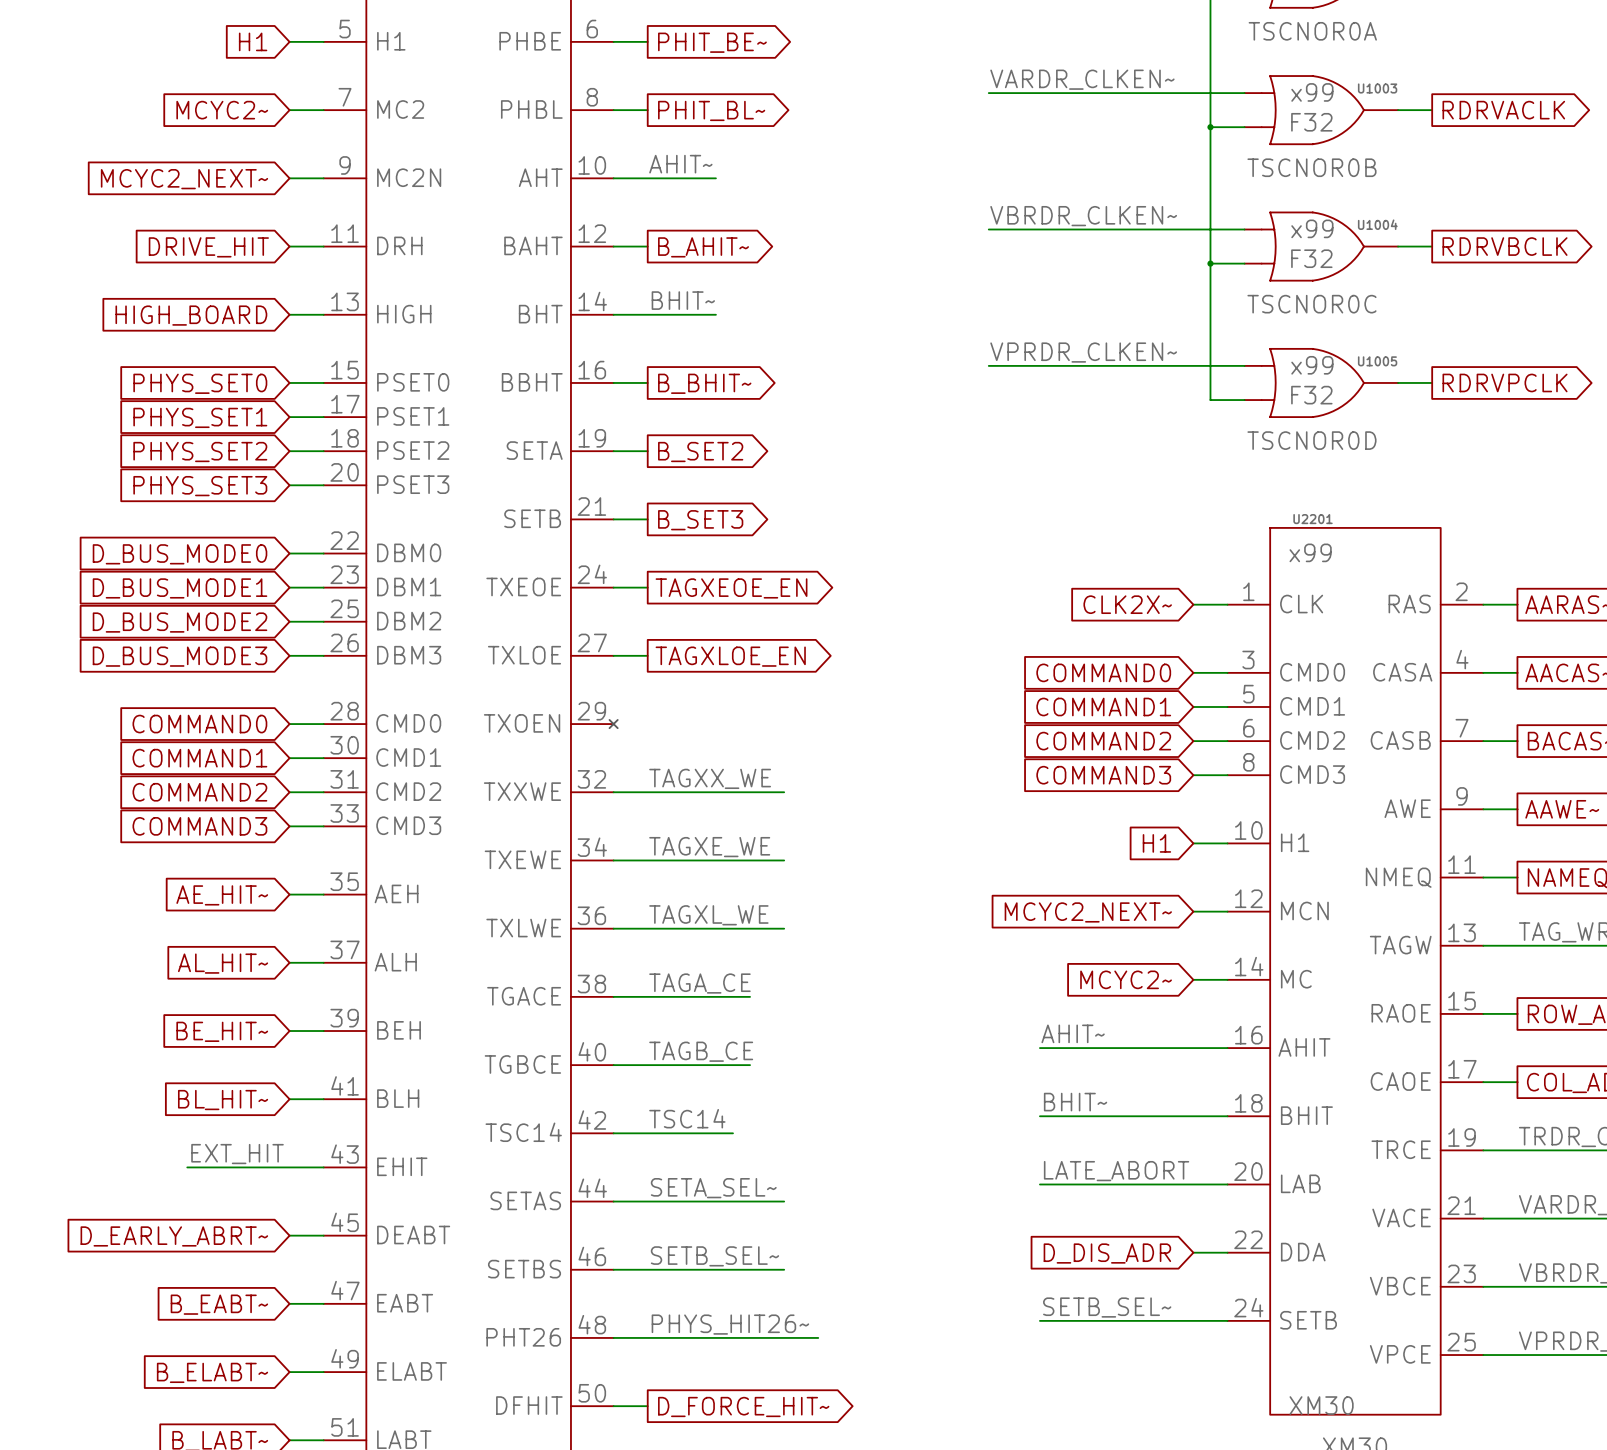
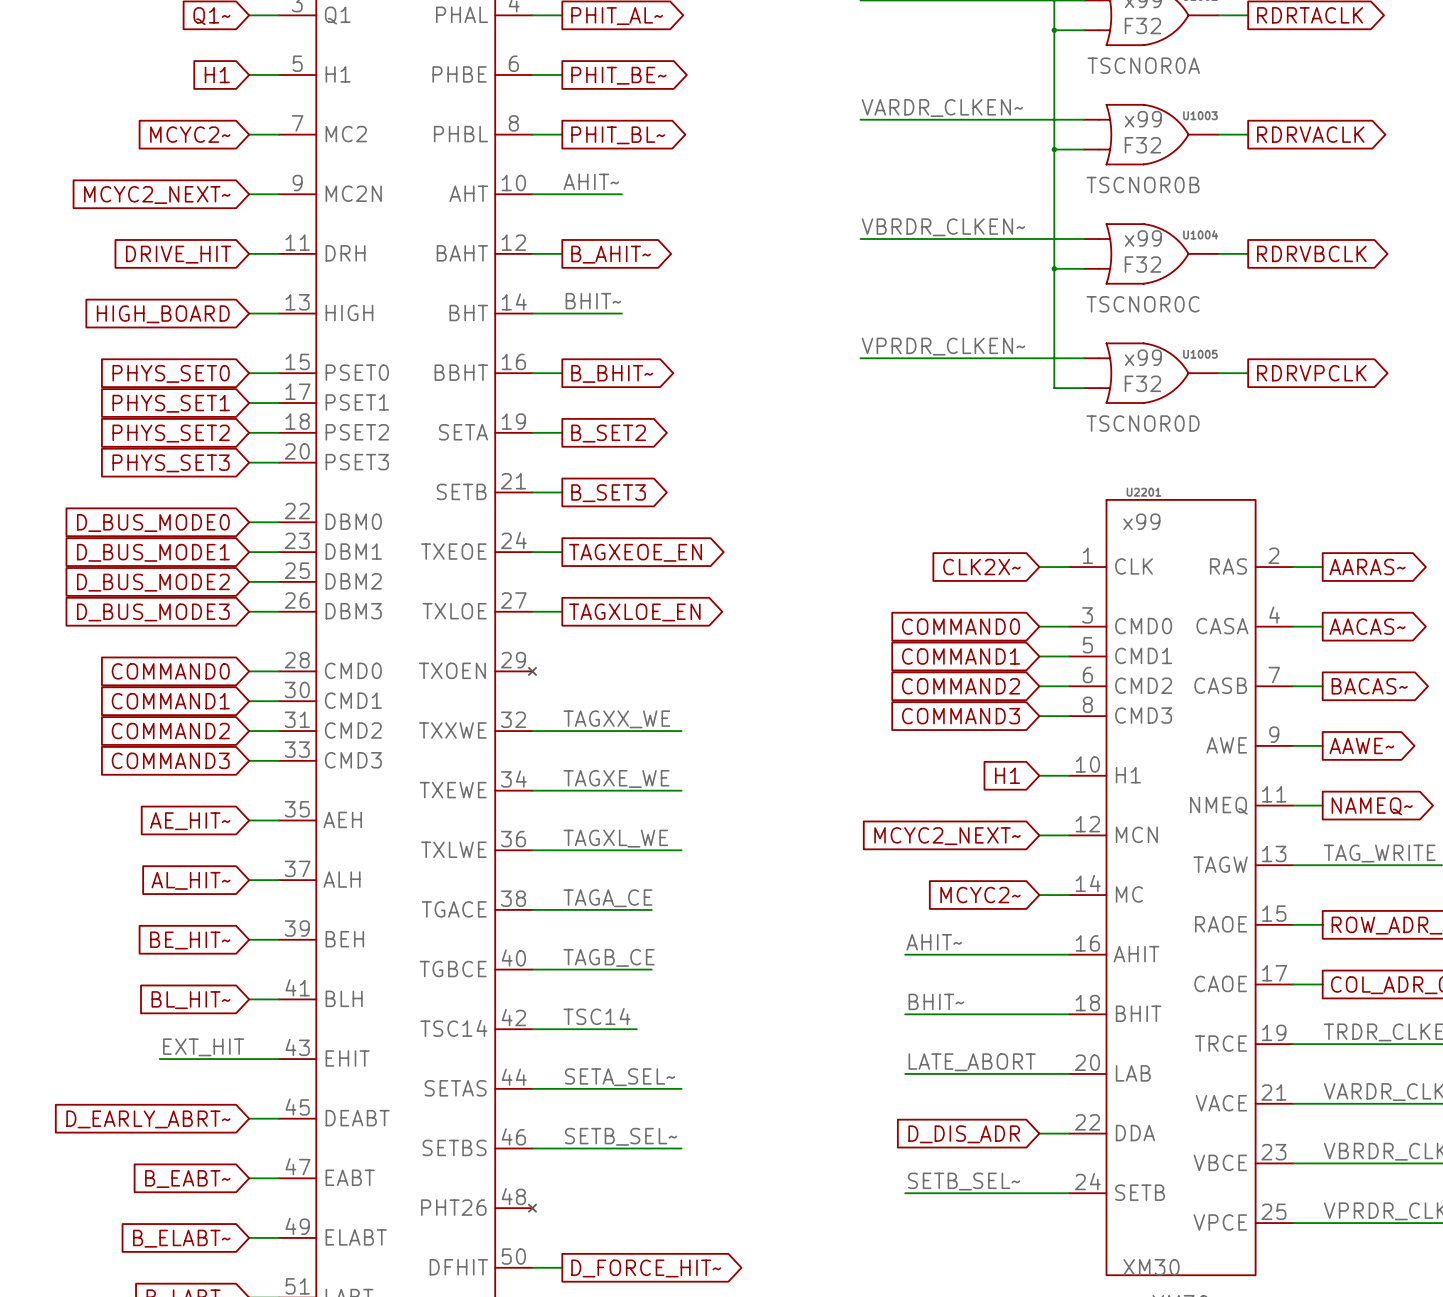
label: PHYS_HIT26~ (730, 1324) -> none
wire: (613, 1337) (818, 1337) -> none
no-connect mark: none -> (532, 1208)

